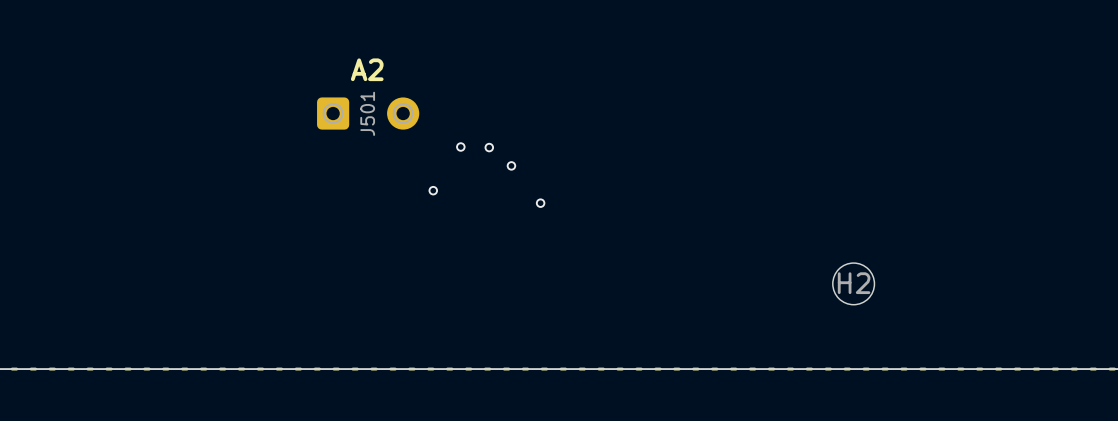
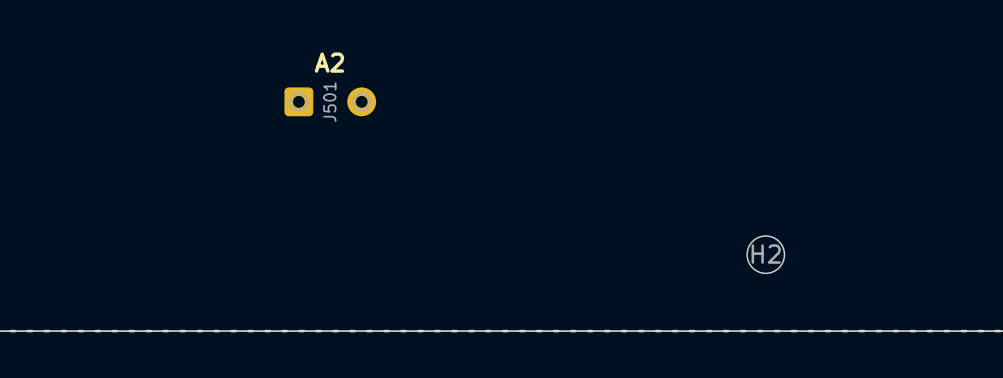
via: (460, 147) -> none
via: (489, 147) -> none
via: (511, 165) -> none
via: (433, 190) -> none
via: (540, 203) -> none

